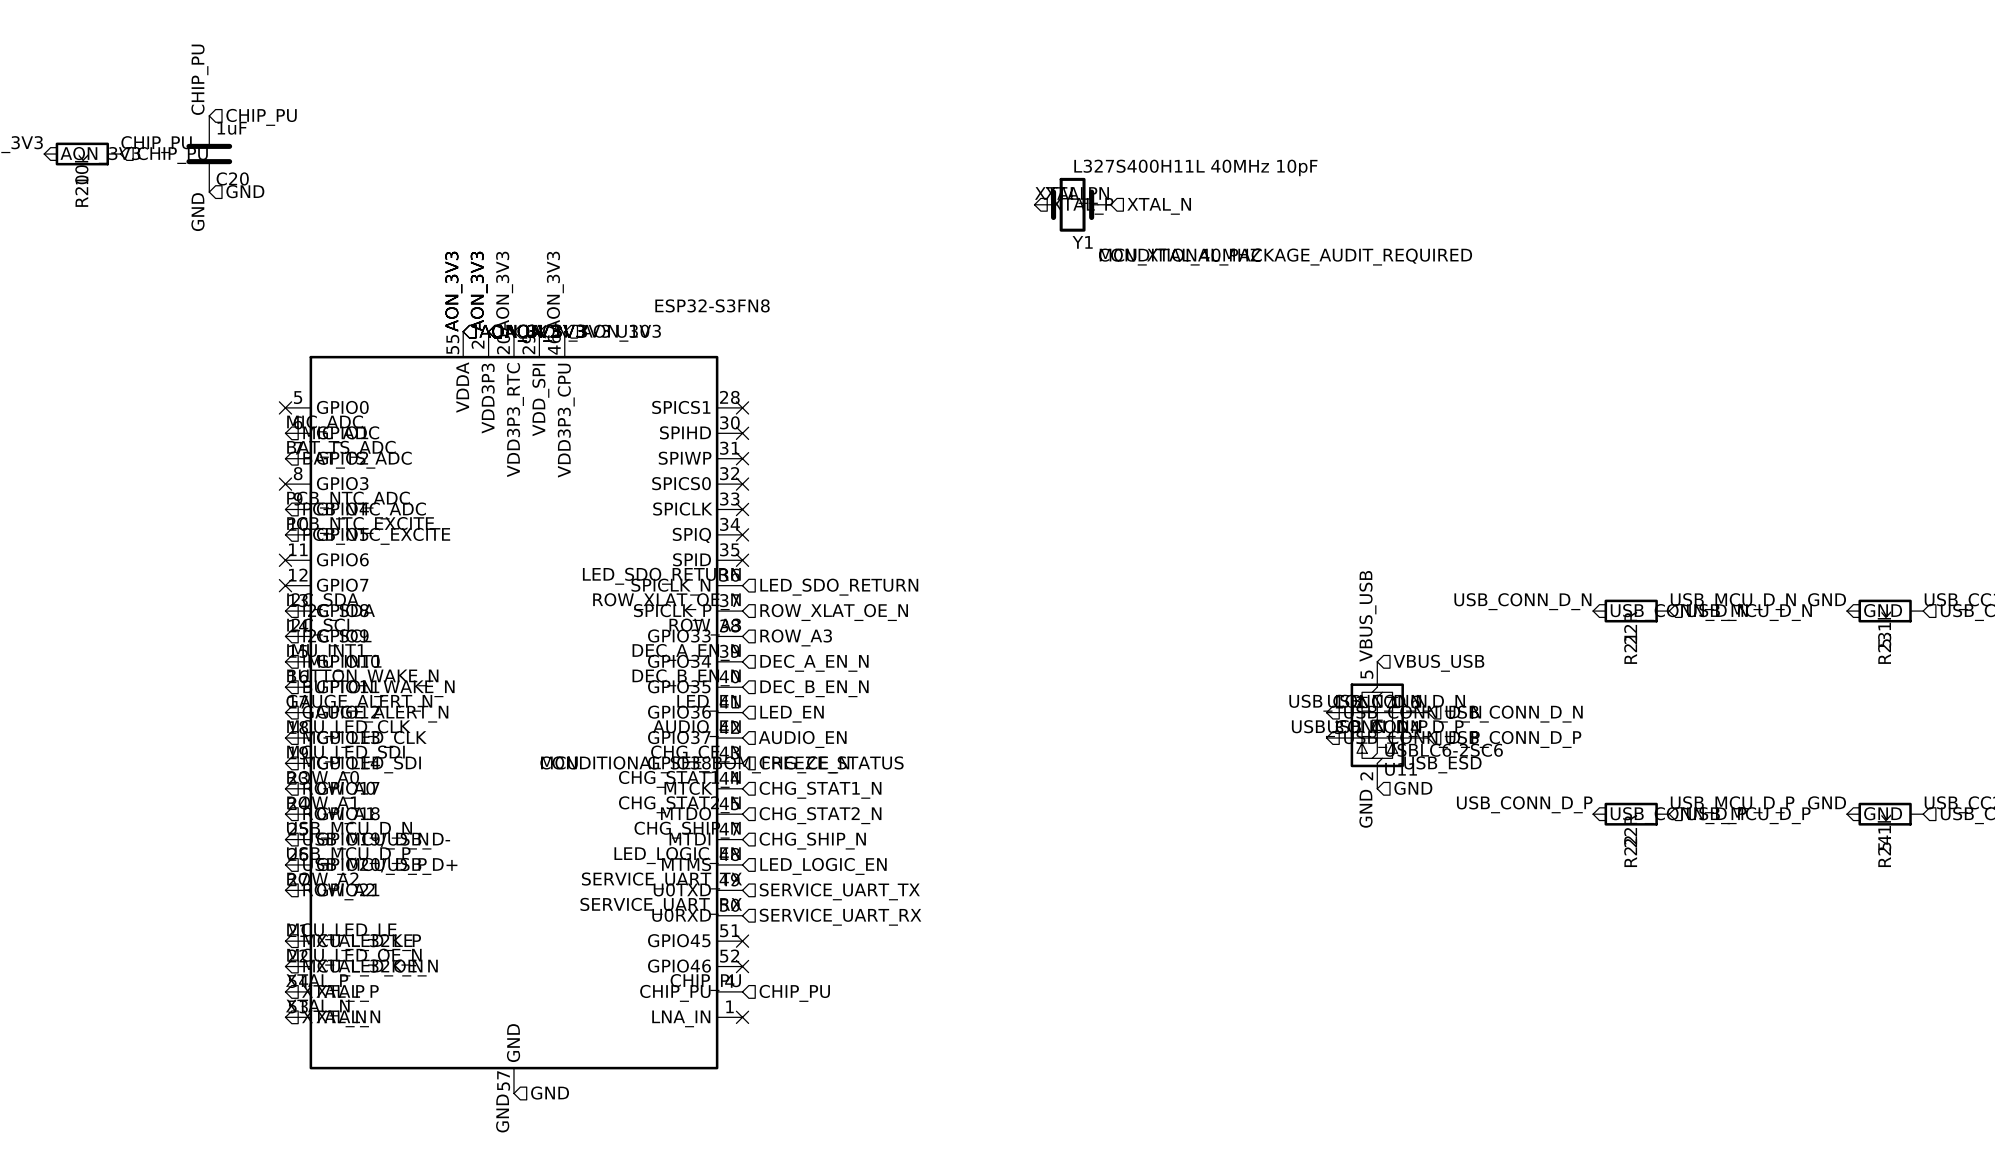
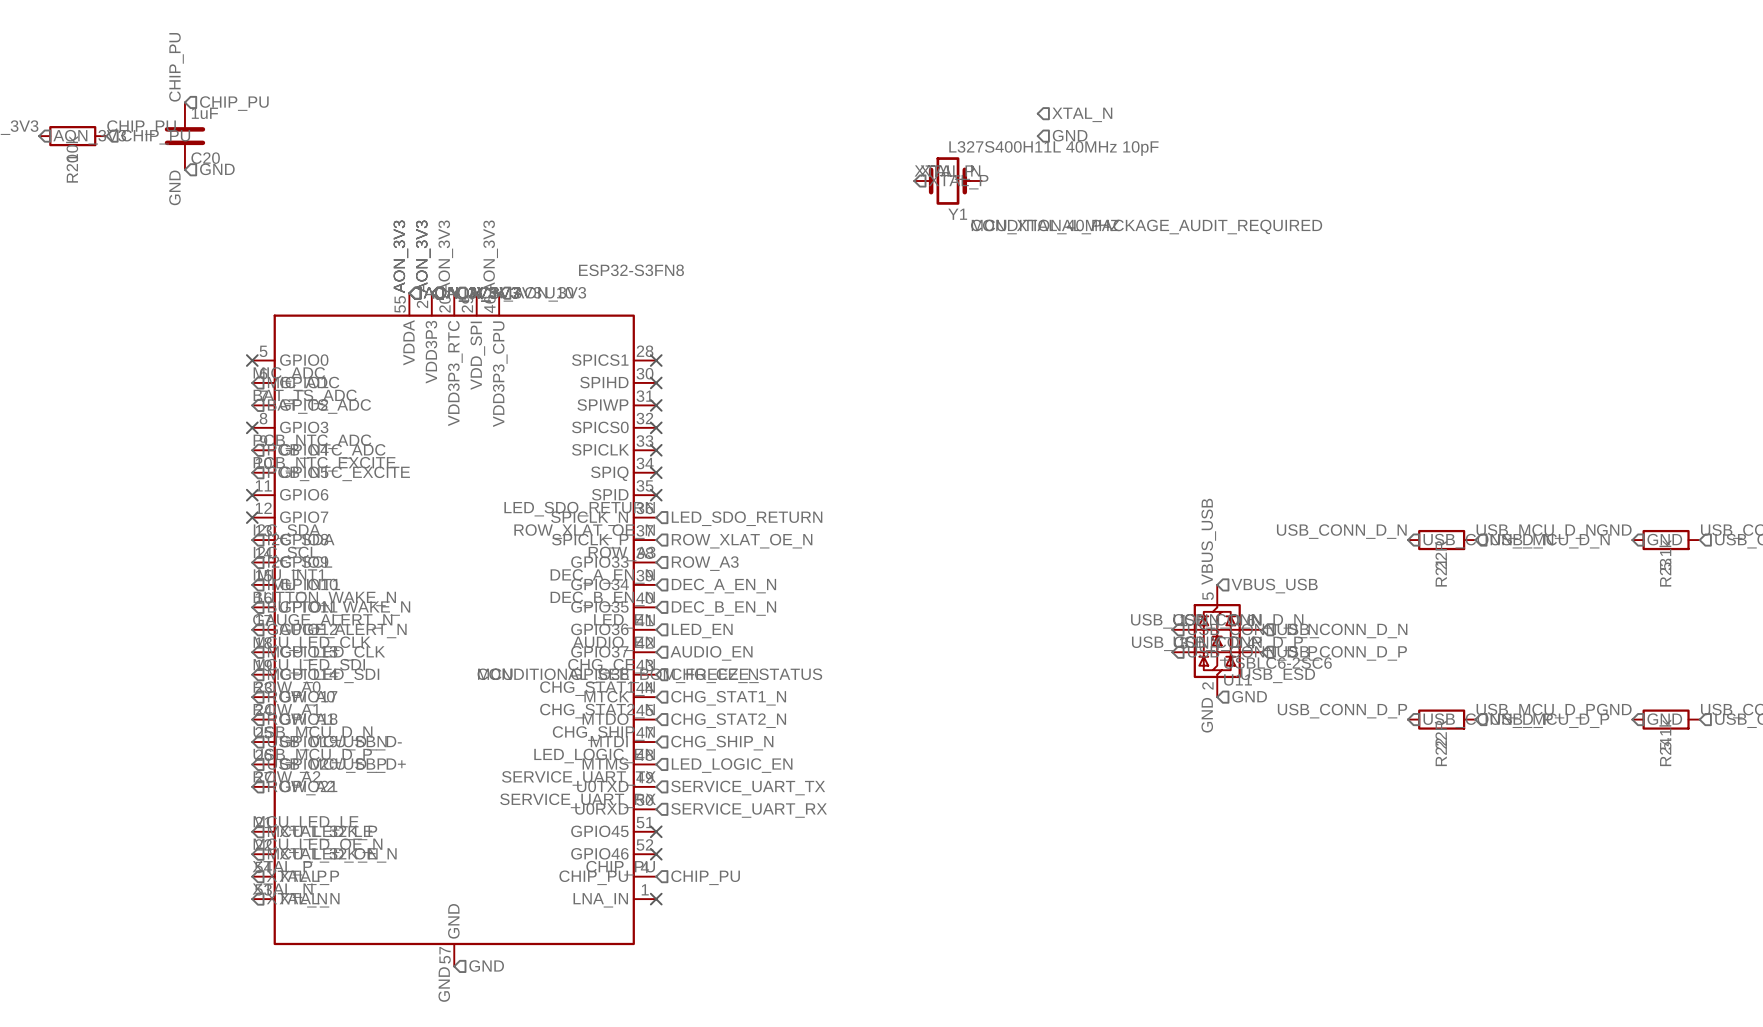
hierarchical label: none -> GND (1070, 135)
hierarchical label position: XTAL_N (1159, 206) -> XTAL_N (1082, 114)

